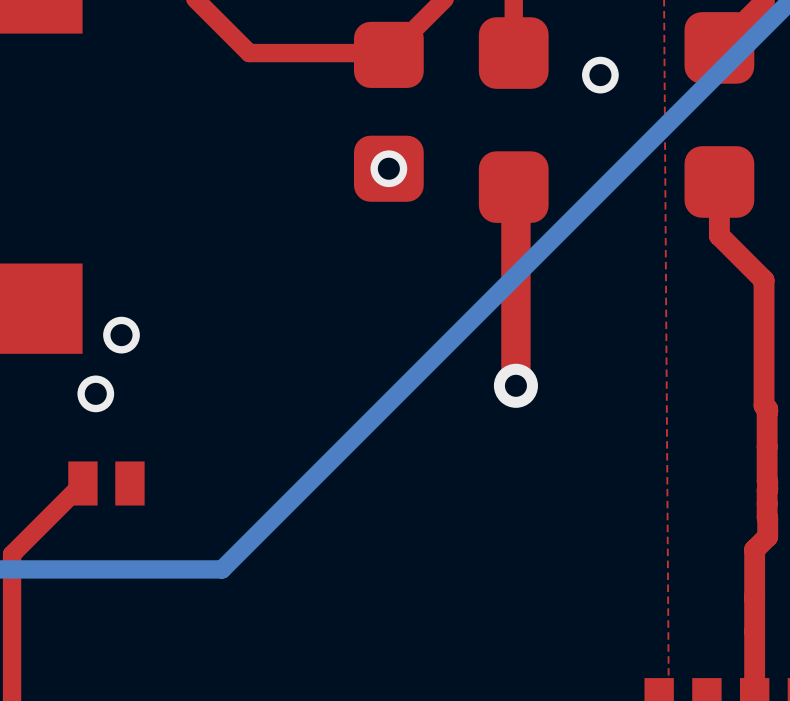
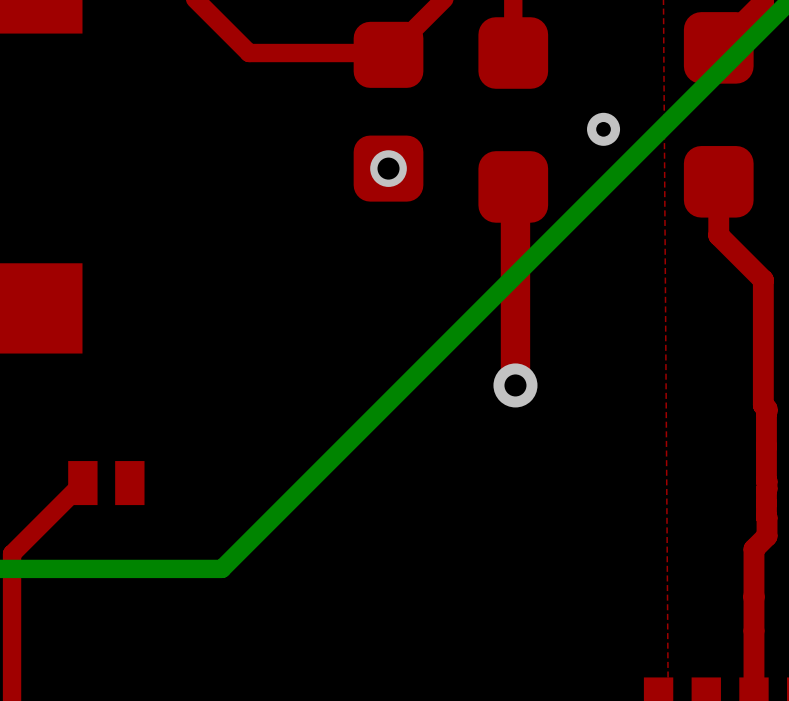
via: (600, 75) -> none
via: none -> (603, 129)
via: (121, 335) -> none
via: (95, 393) -> none

